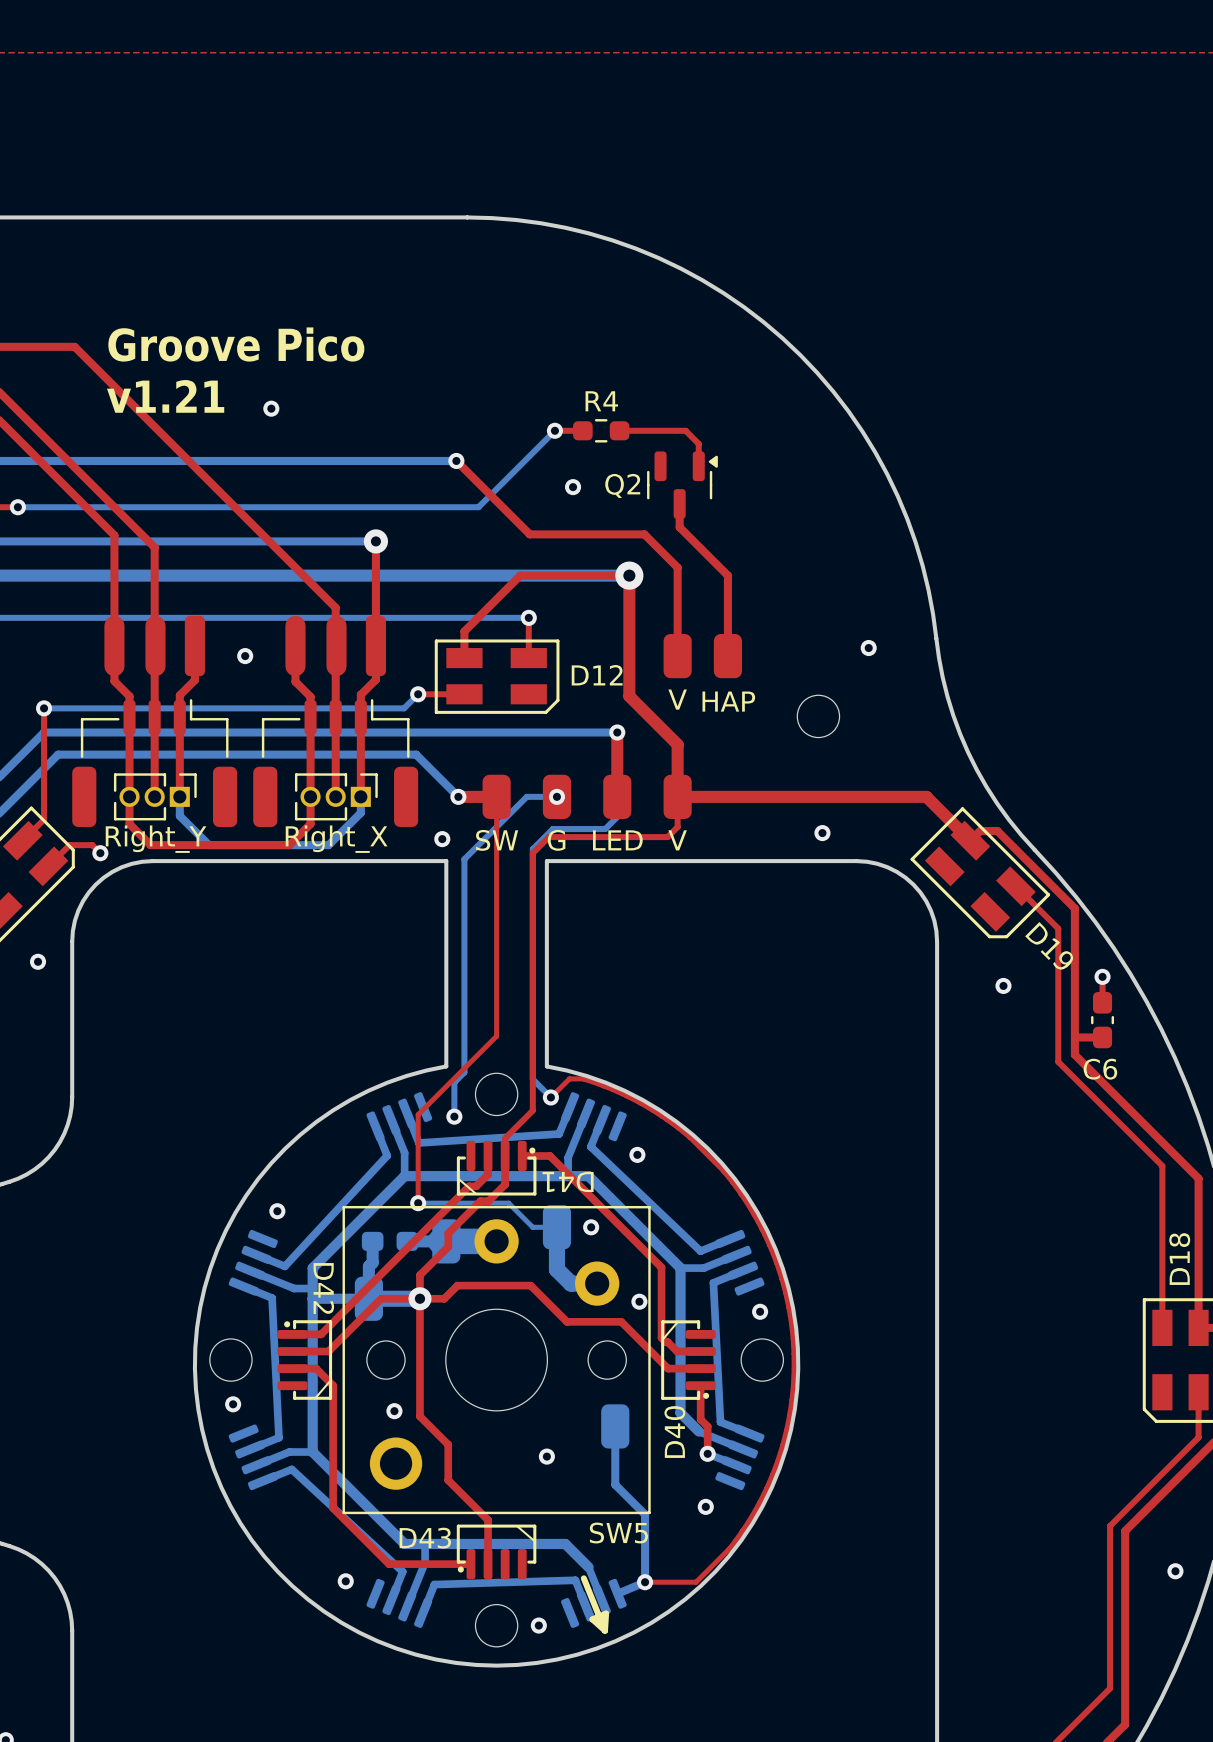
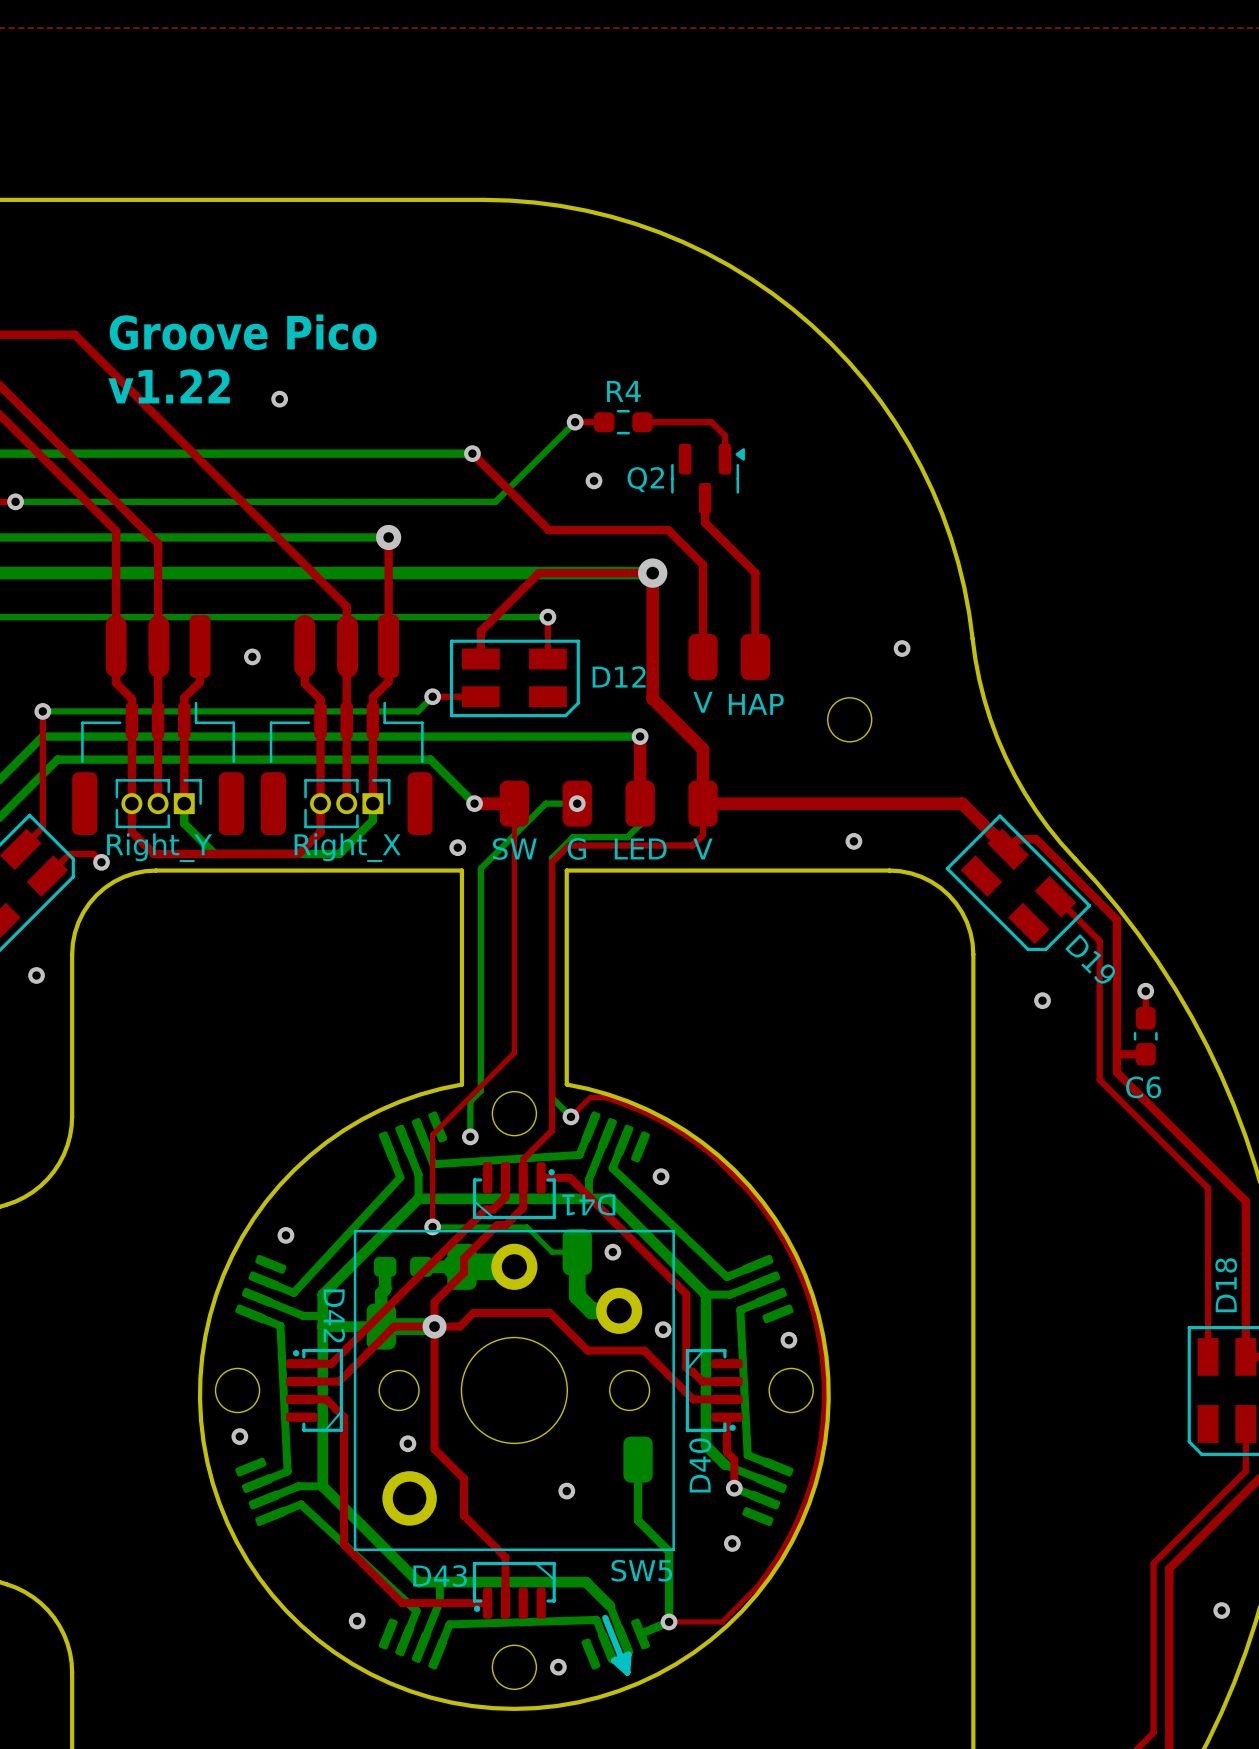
text: v1.21 (165, 396) -> v1.22 (169, 386)

